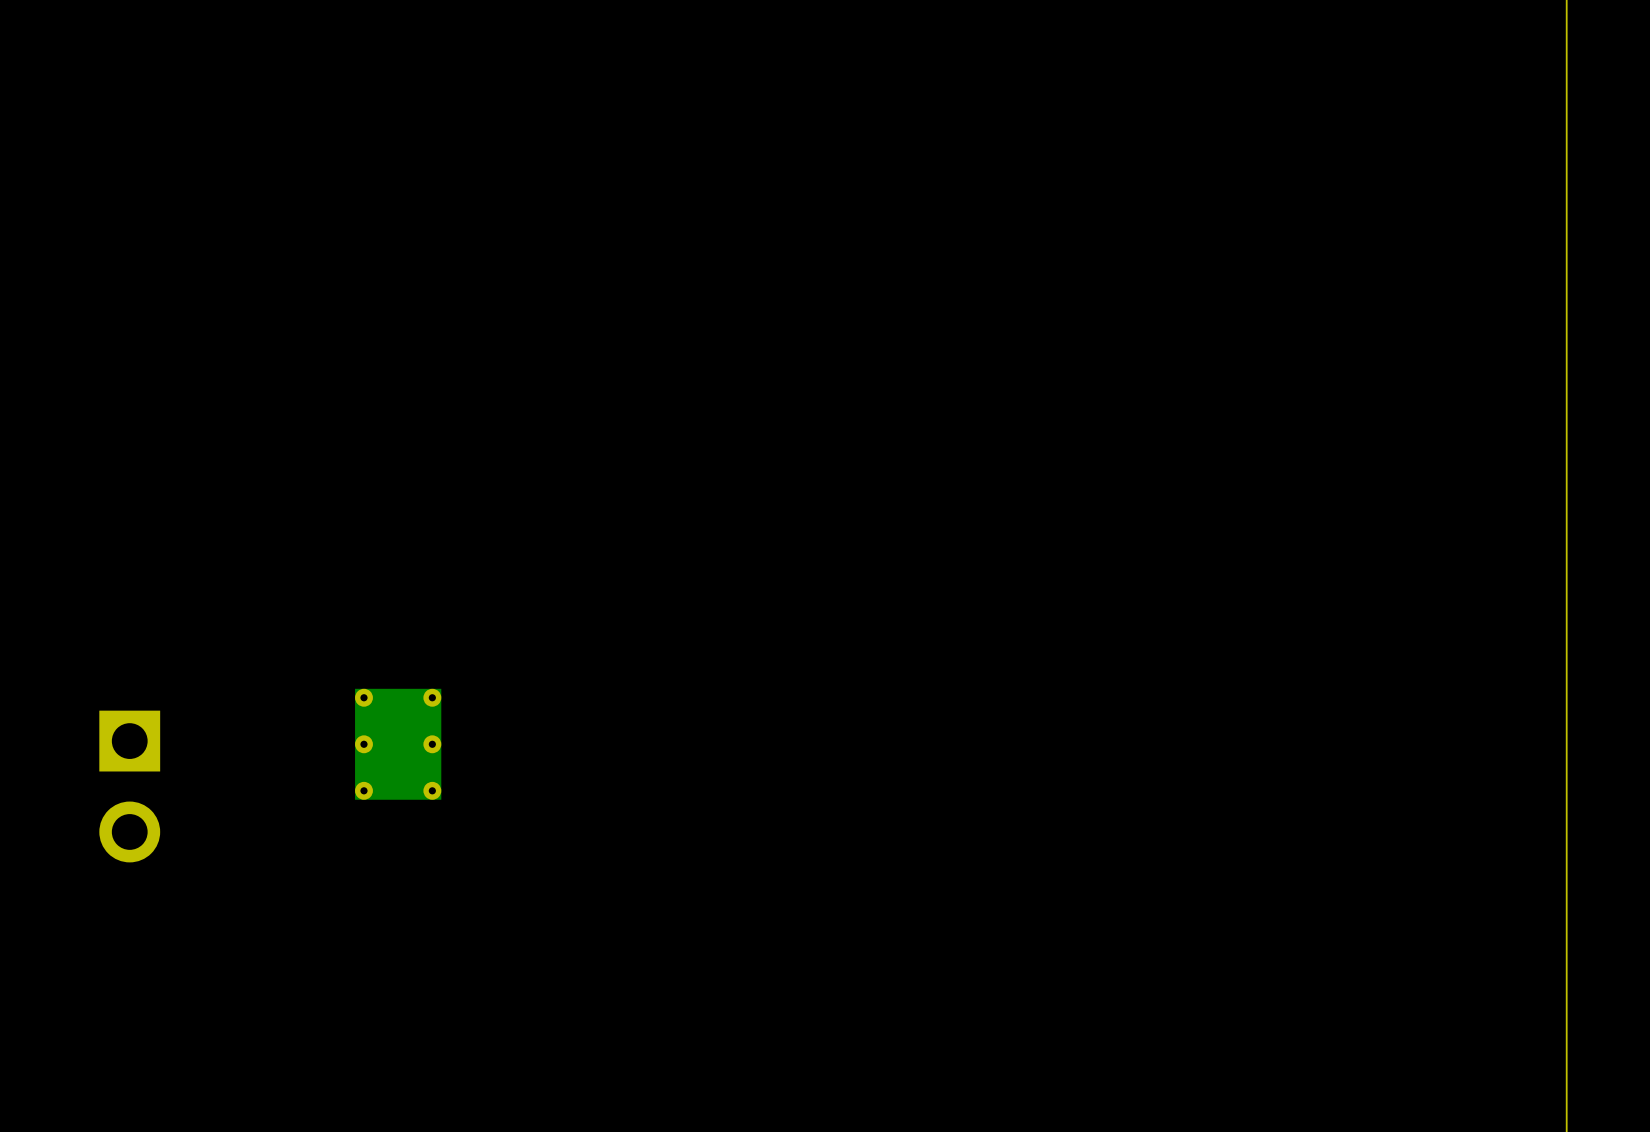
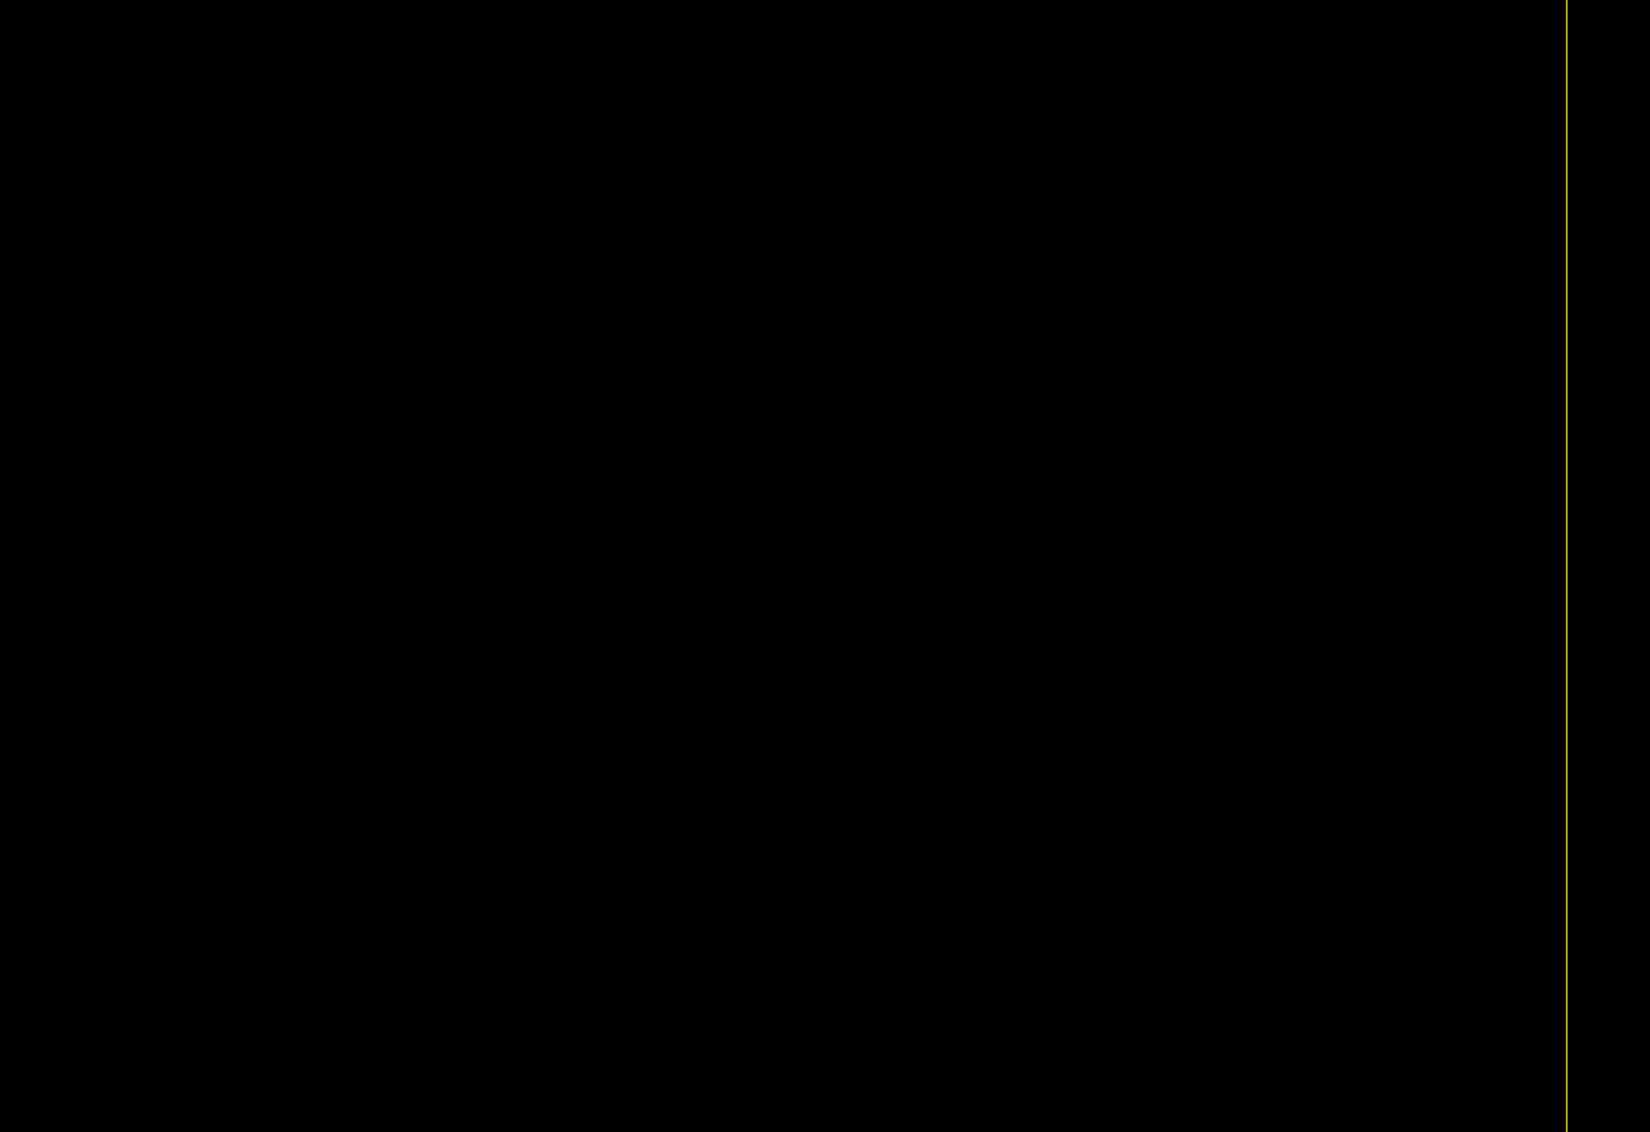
part: (398, 744) -> none
part: (129, 786) -> none

